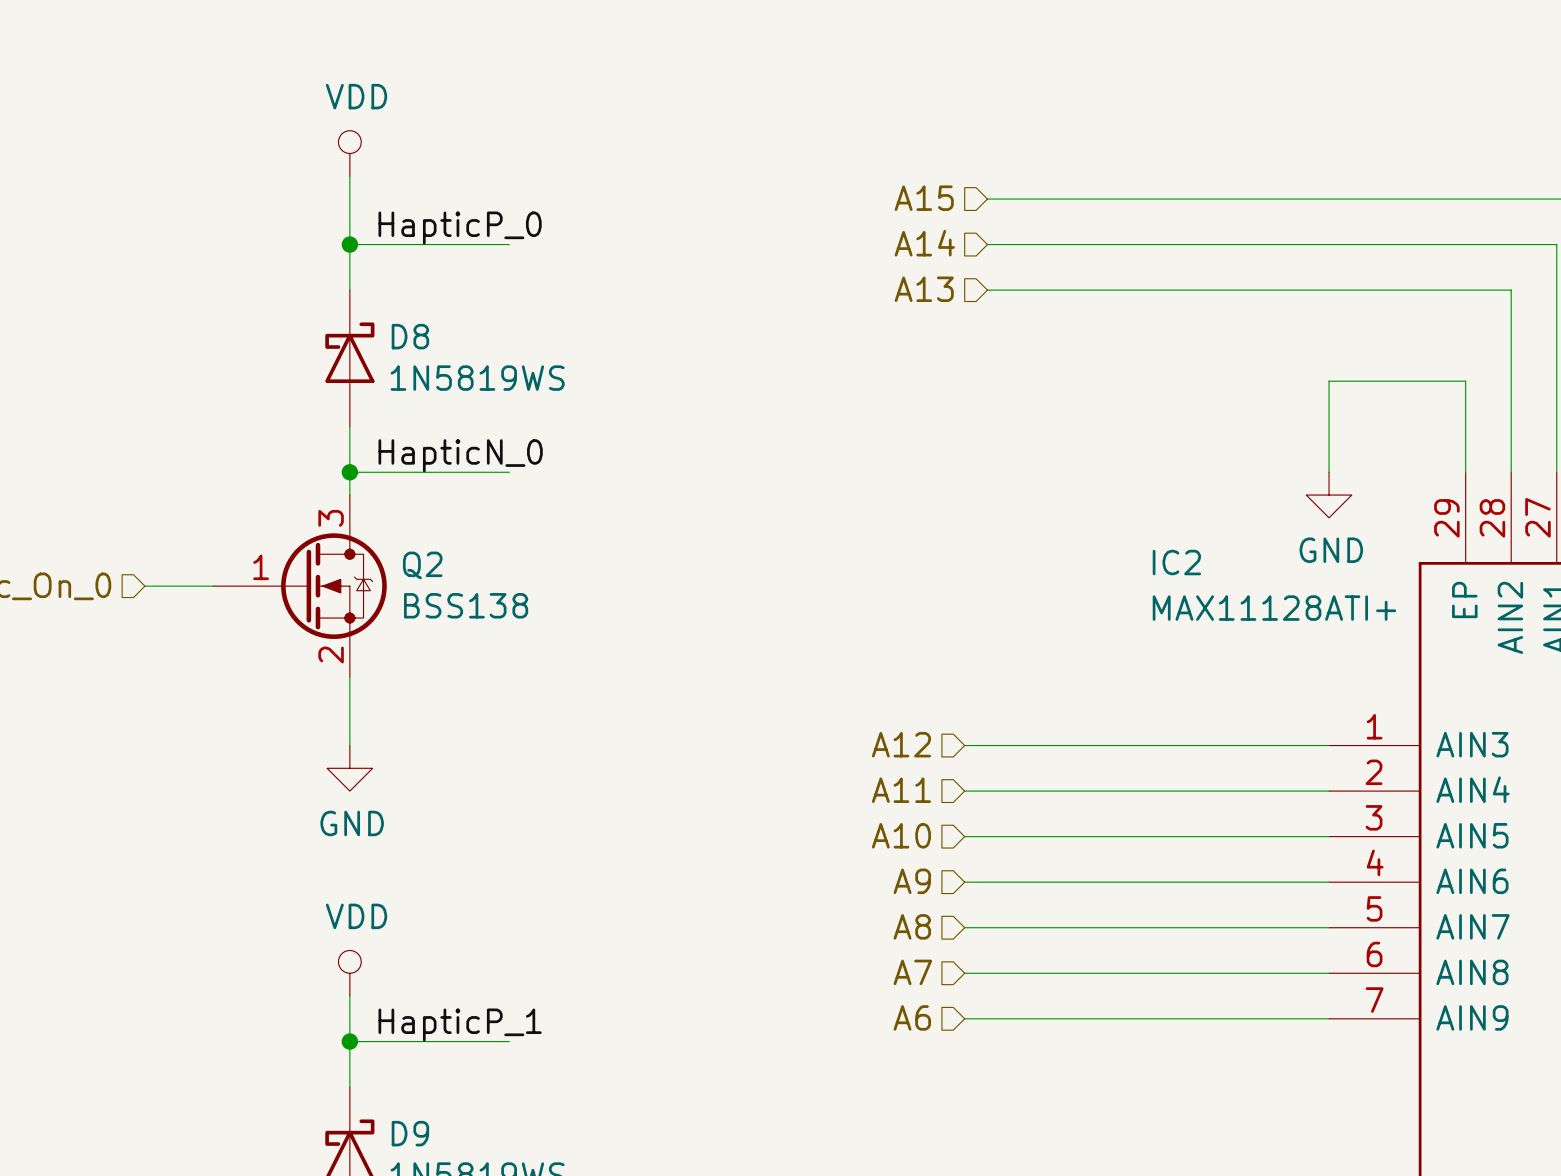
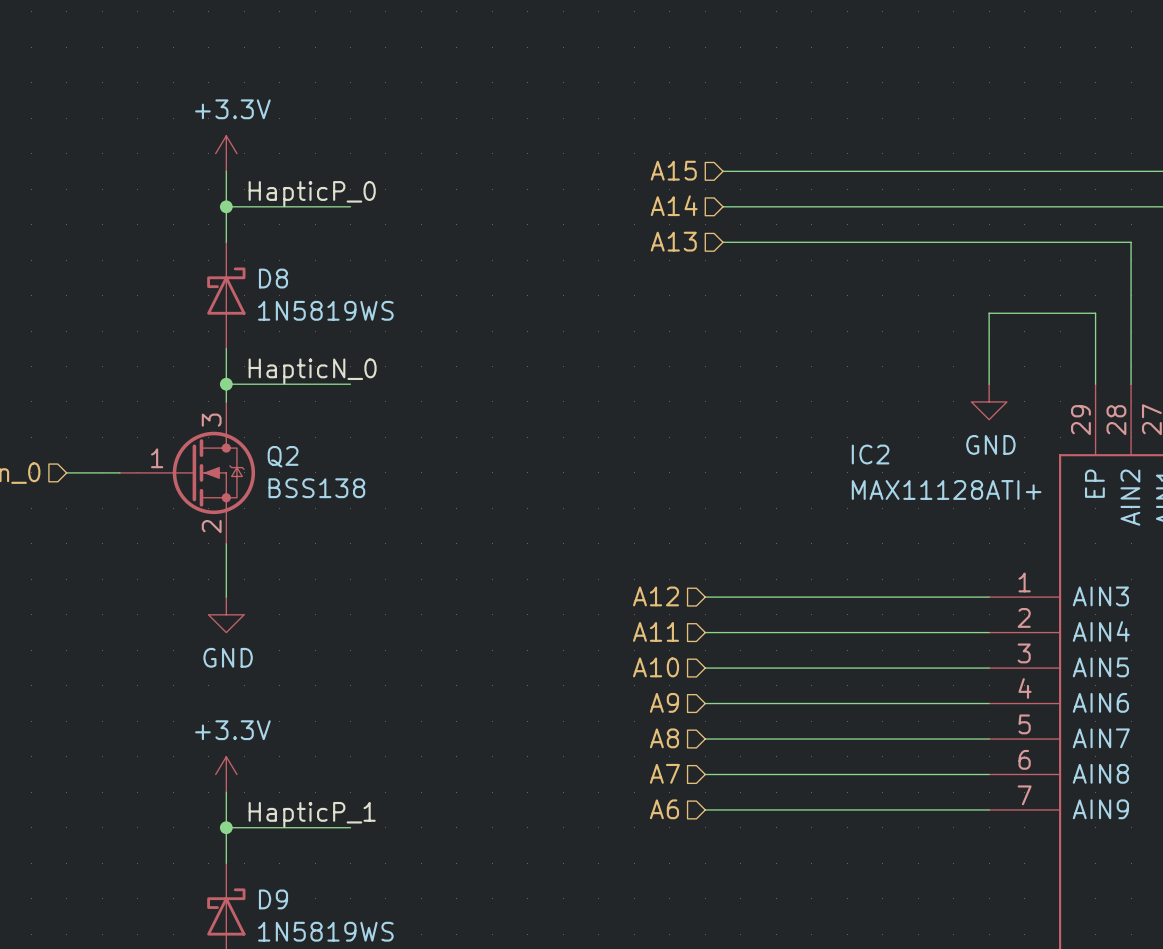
power symbol: VDD (349, 153) -> none
power symbol: none -> +3.3V (226, 153)
power symbol: VDD (349, 973) -> +3.3V (226, 774)

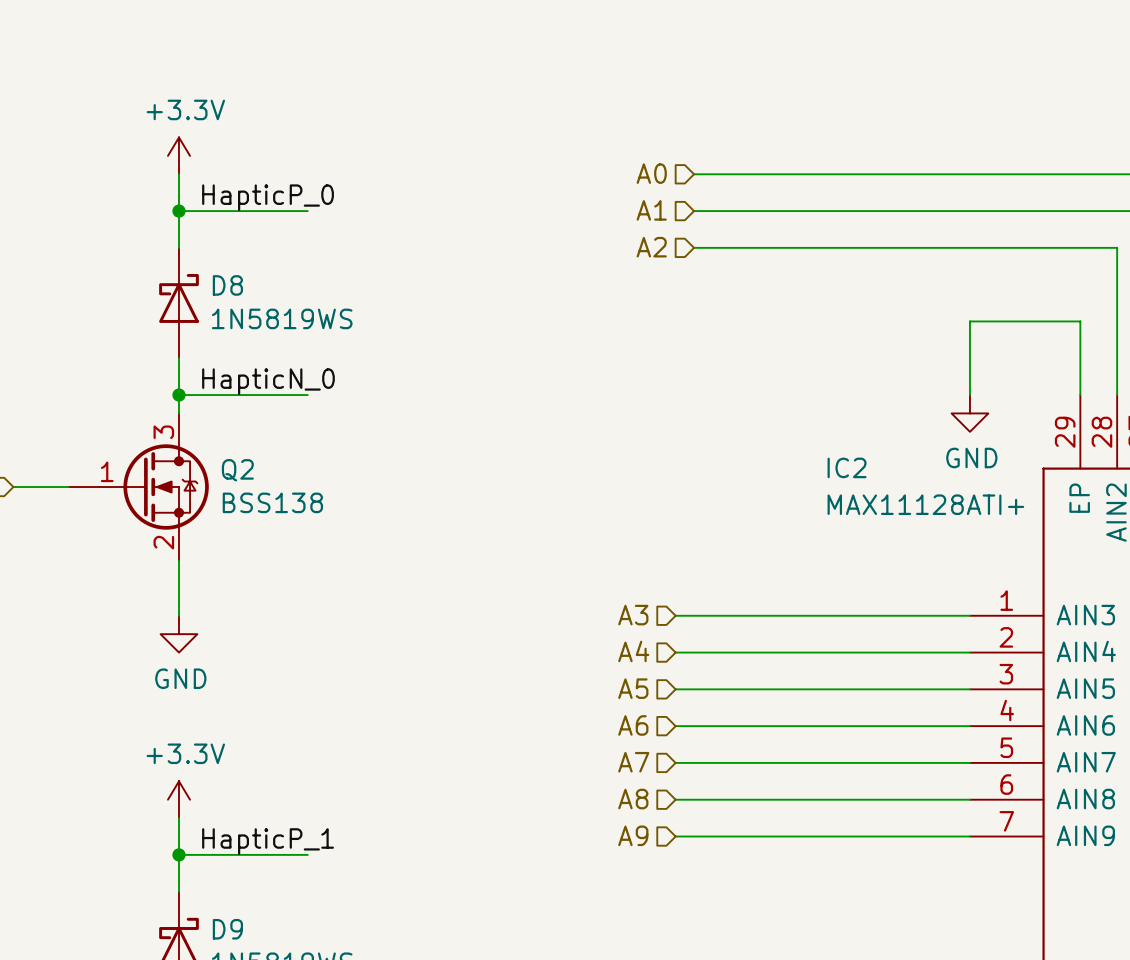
hierarchical label: A15 (673, 170) -> A0 (651, 173)
hierarchical label: A14 (674, 205) -> A1 (651, 210)
hierarchical label: A13 (673, 241) -> A2 (651, 247)
hierarchical label: A12 (656, 596) -> A3 (633, 615)
hierarchical label: A11 (656, 631) -> A4 (633, 651)
hierarchical label: A10 (656, 667) -> A5 (633, 688)
hierarchical label: A9 (664, 702) -> A6 (633, 725)
hierarchical label: A8 (664, 738) -> A7 (633, 762)
hierarchical label: A7 (664, 773) -> A8 (633, 799)
hierarchical label: A6 (664, 809) -> A9 (633, 835)

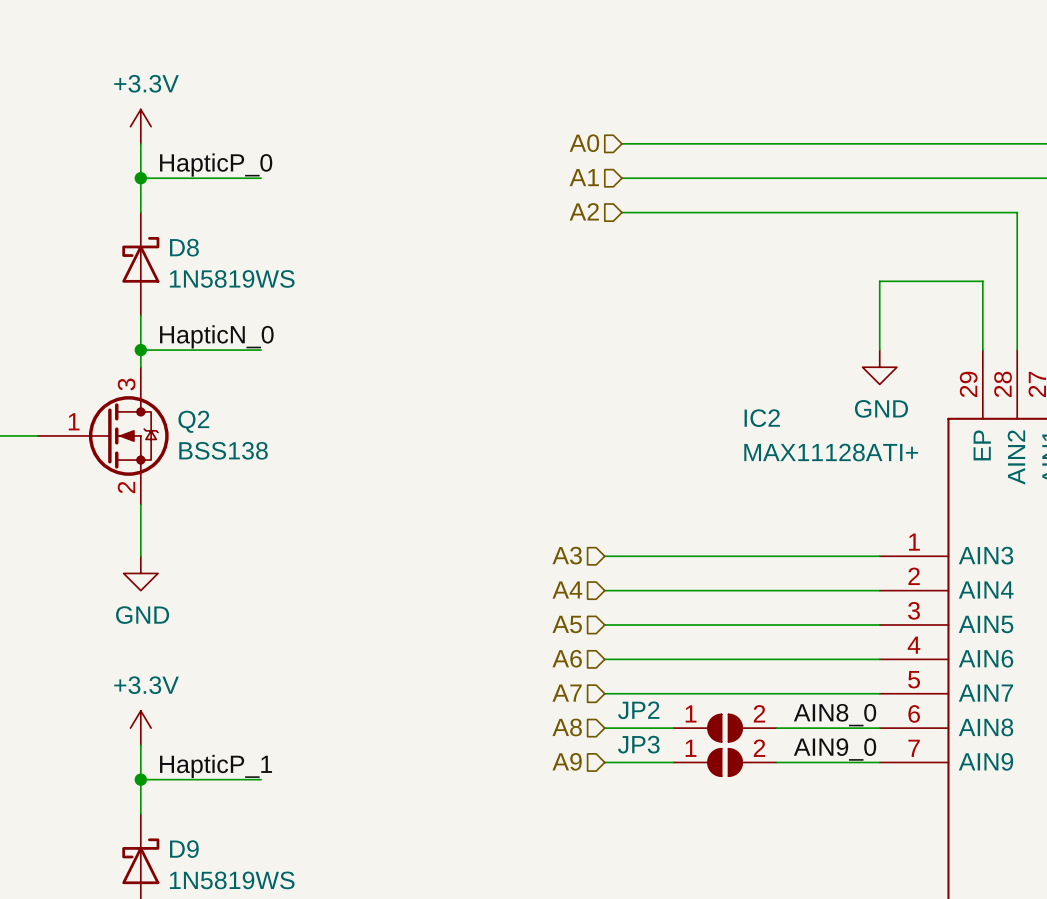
label: none -> AIN8_0 (835, 715)
JP2: none -> (725, 728)
label: none -> AIN9_0 (835, 749)
JP3: none -> (725, 762)

